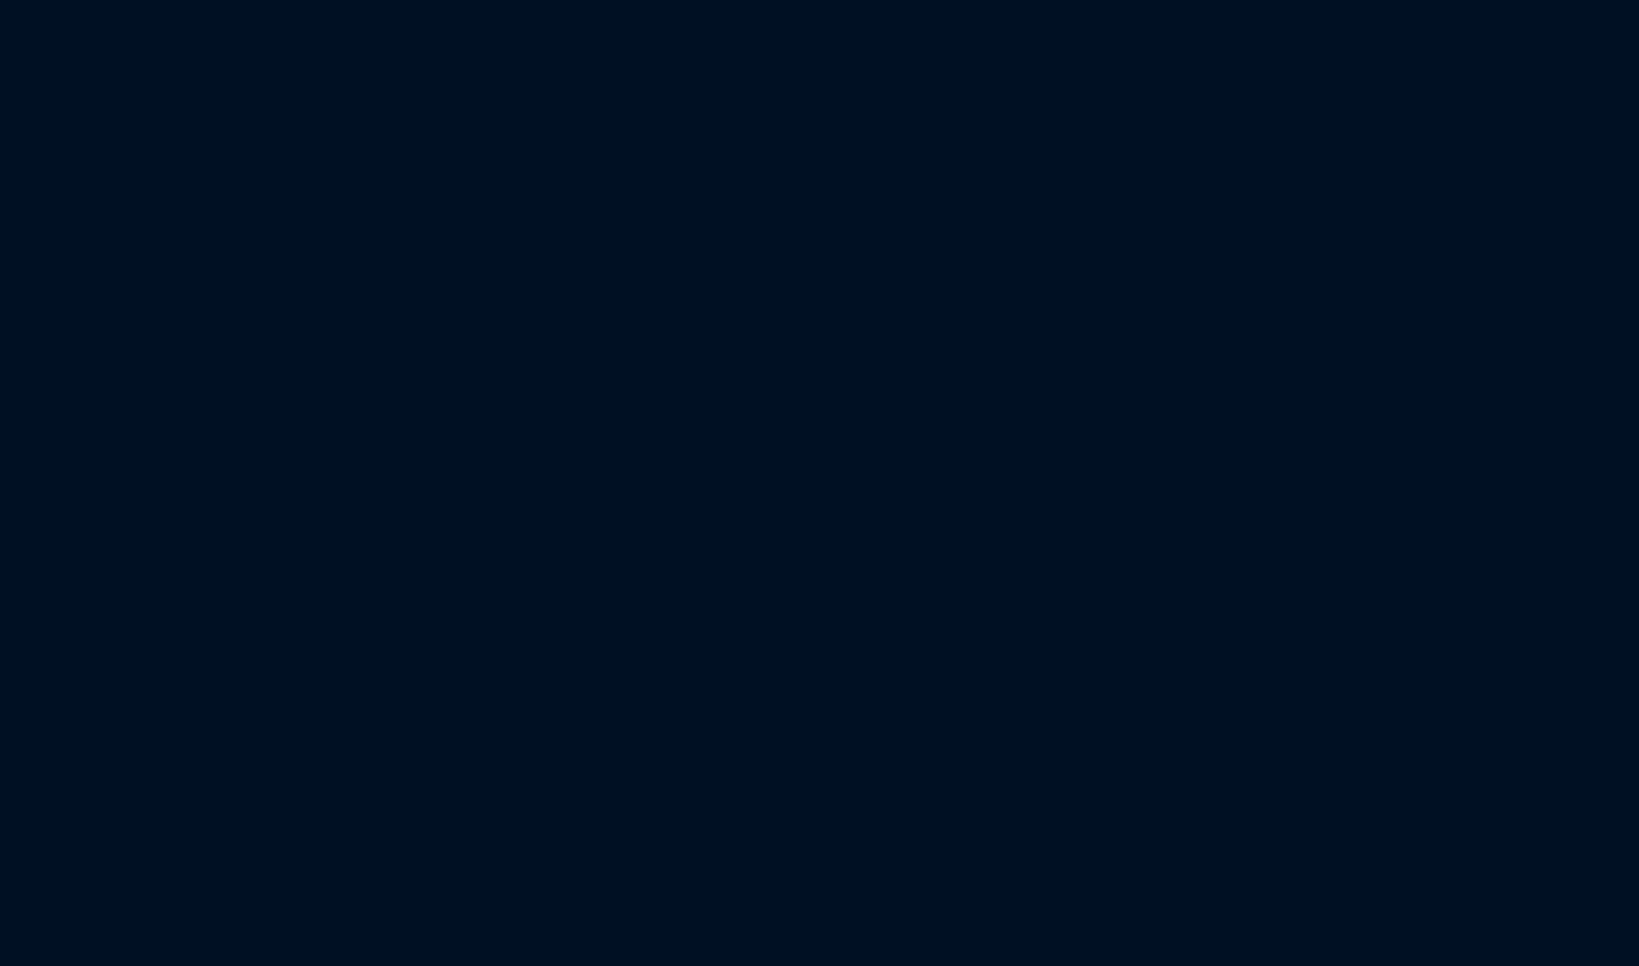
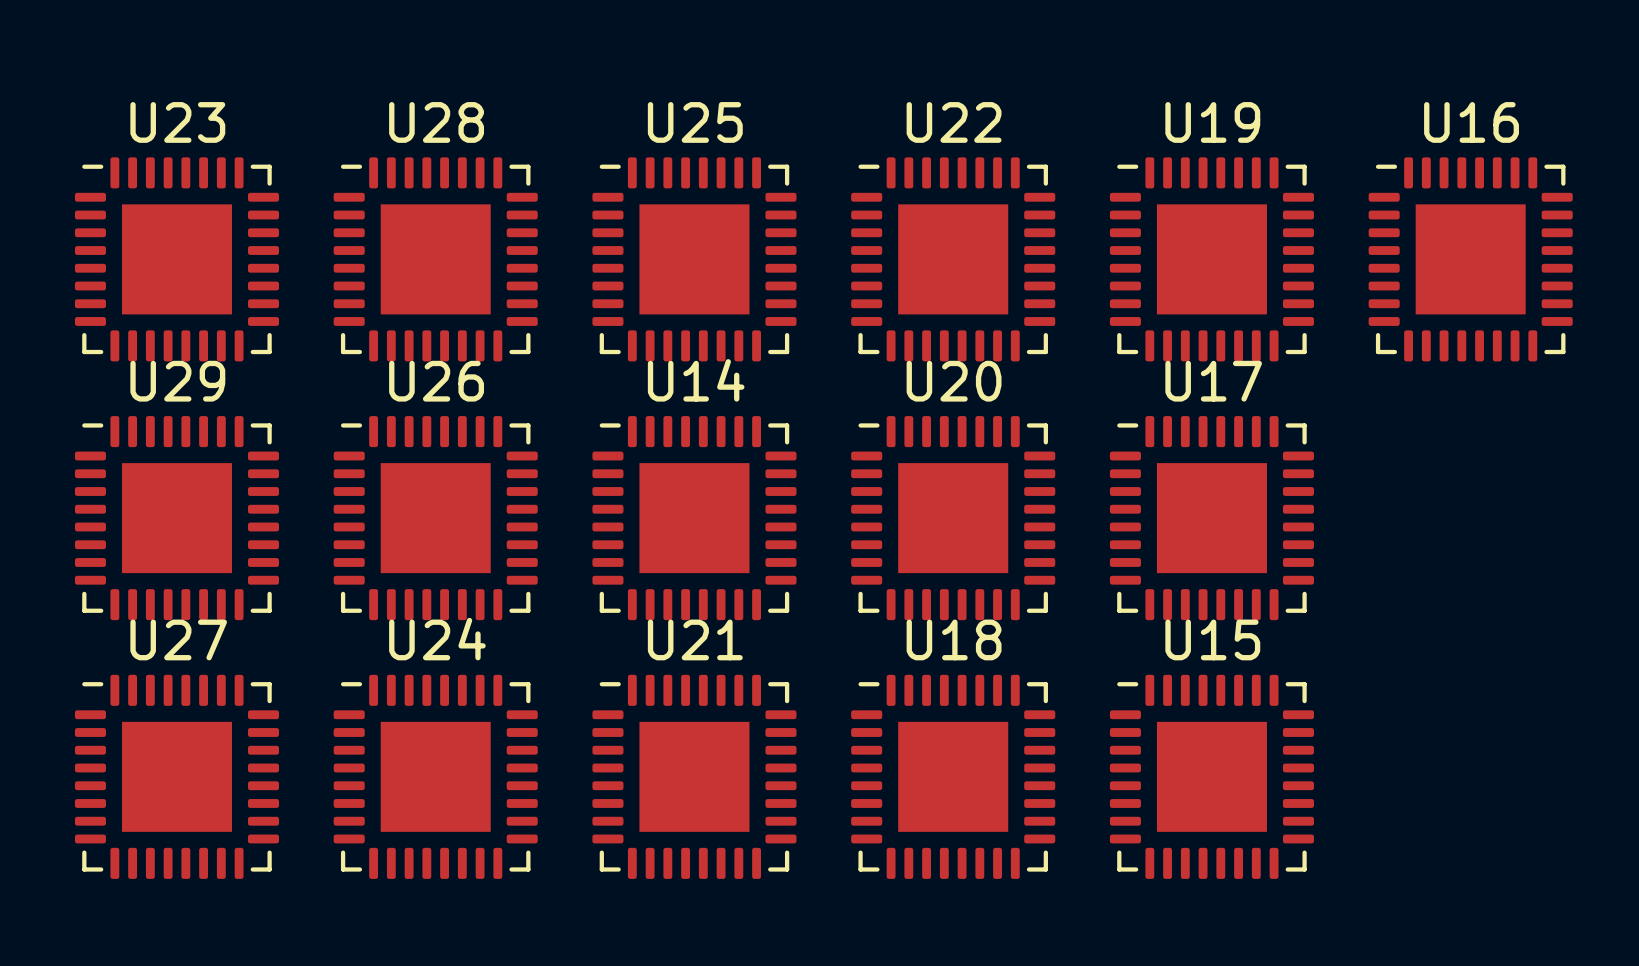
U23: none -> (176, 259)
U28: none -> (435, 259)
U25: none -> (694, 259)
U22: none -> (953, 259)
U19: none -> (1211, 259)
U16: none -> (1470, 259)
U29: none -> (176, 518)
U26: none -> (435, 518)
U14: none -> (694, 518)
U20: none -> (953, 518)
U17: none -> (1211, 518)
U27: none -> (176, 776)
U24: none -> (435, 776)
U21: none -> (694, 776)
U18: none -> (953, 776)
U15: none -> (1211, 776)

